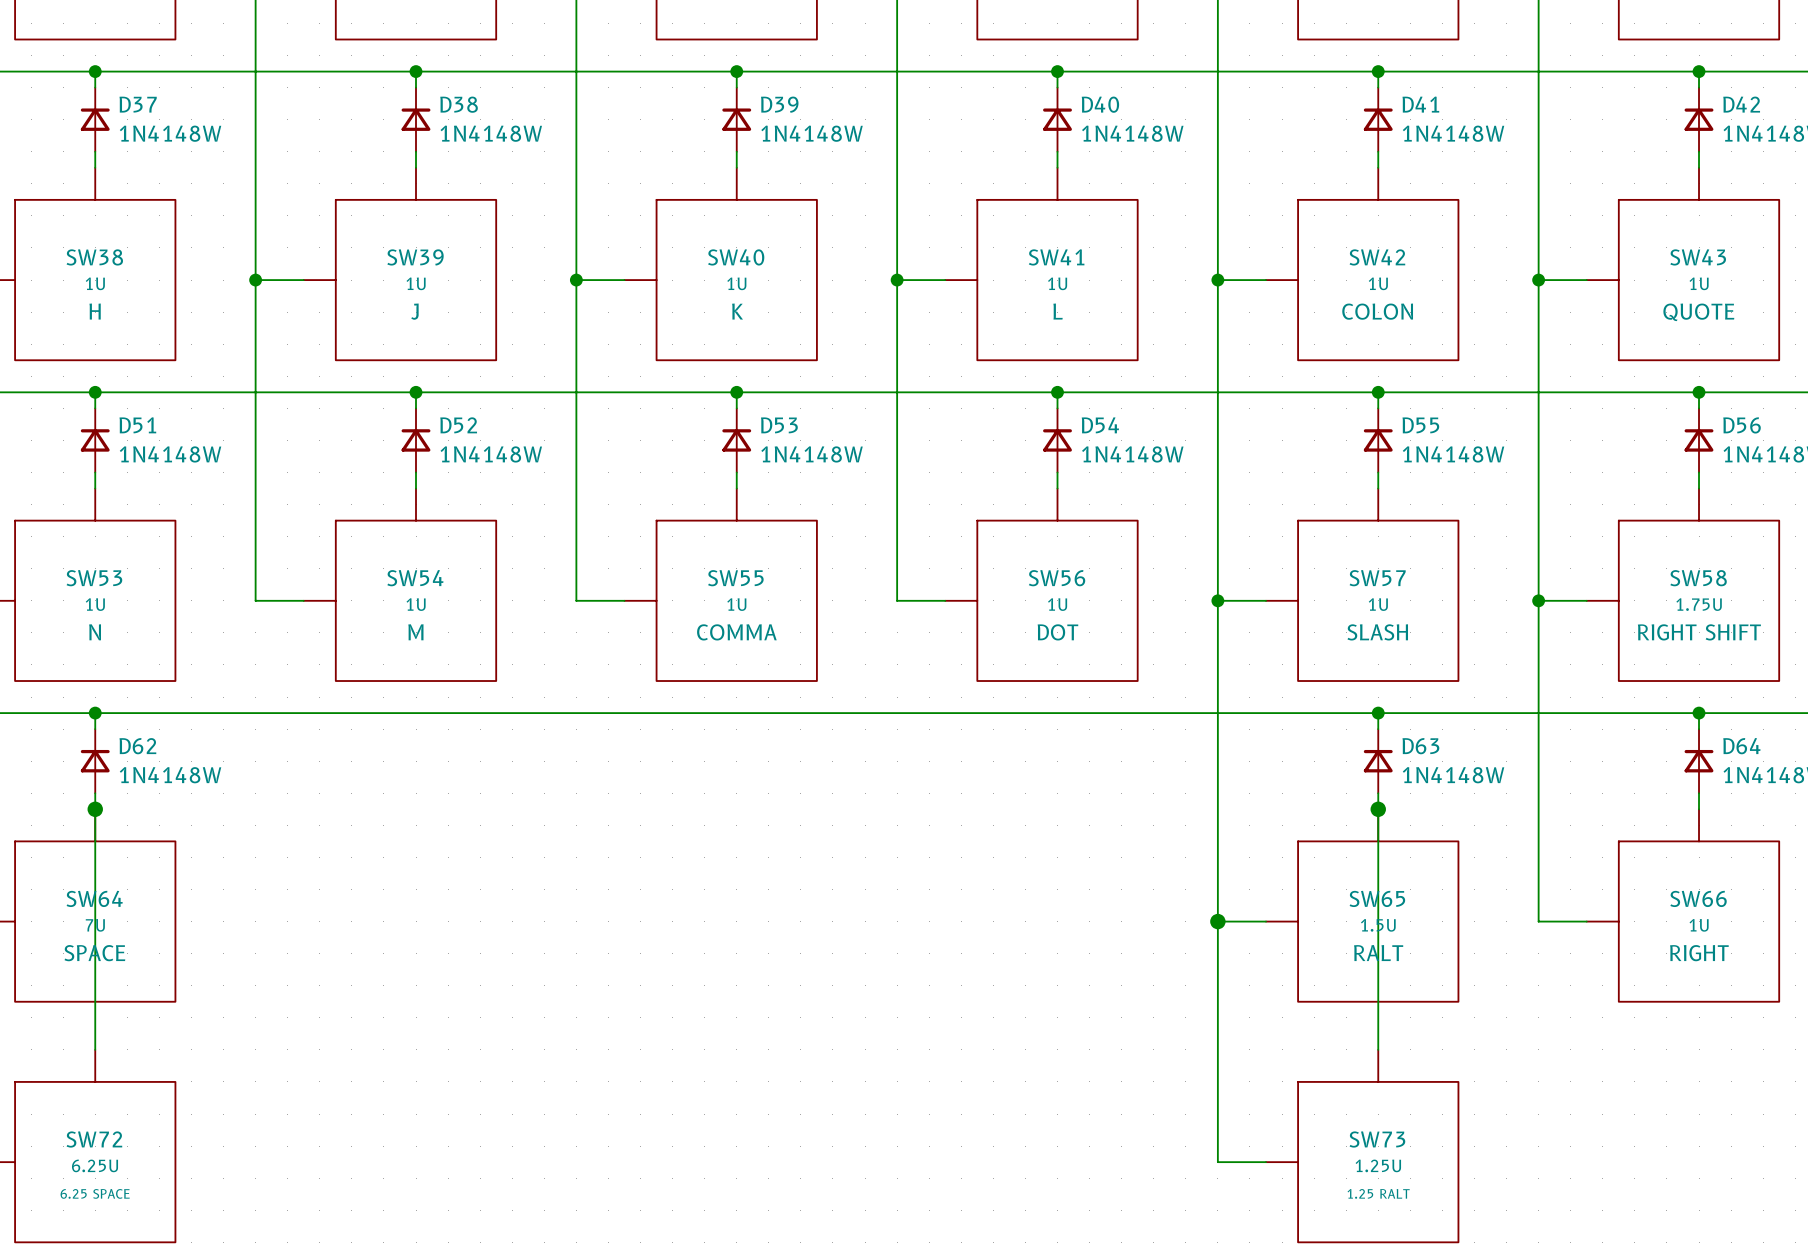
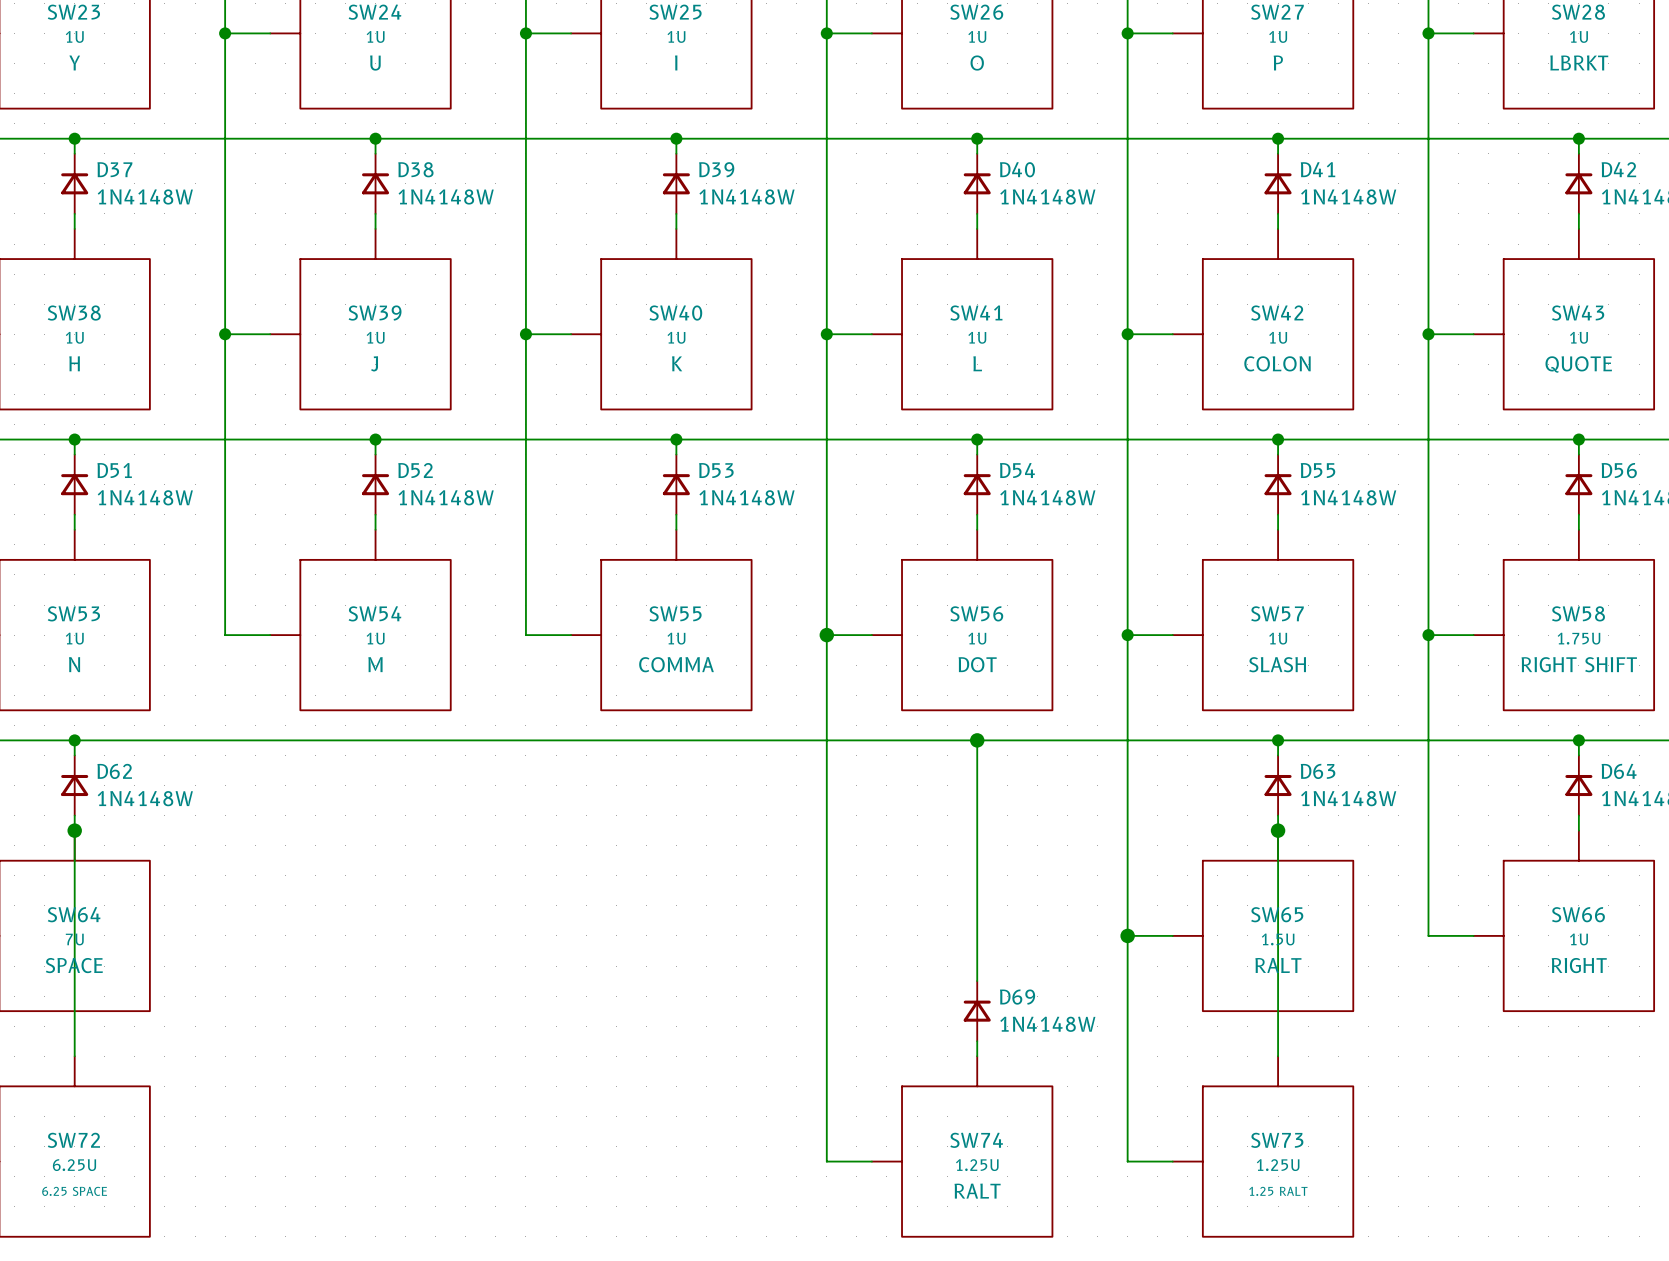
wire: none -> (826, 635) (826, 1161) (871, 1161)
junction: none -> (826, 635)
wire: none -> (977, 740) (977, 981)
junction: none -> (977, 740)
D69: none -> 1N4148W (977, 1011)
wire: none -> (977, 1041) (977, 1056)
SW74: none -> 1.25U (962, 1146)

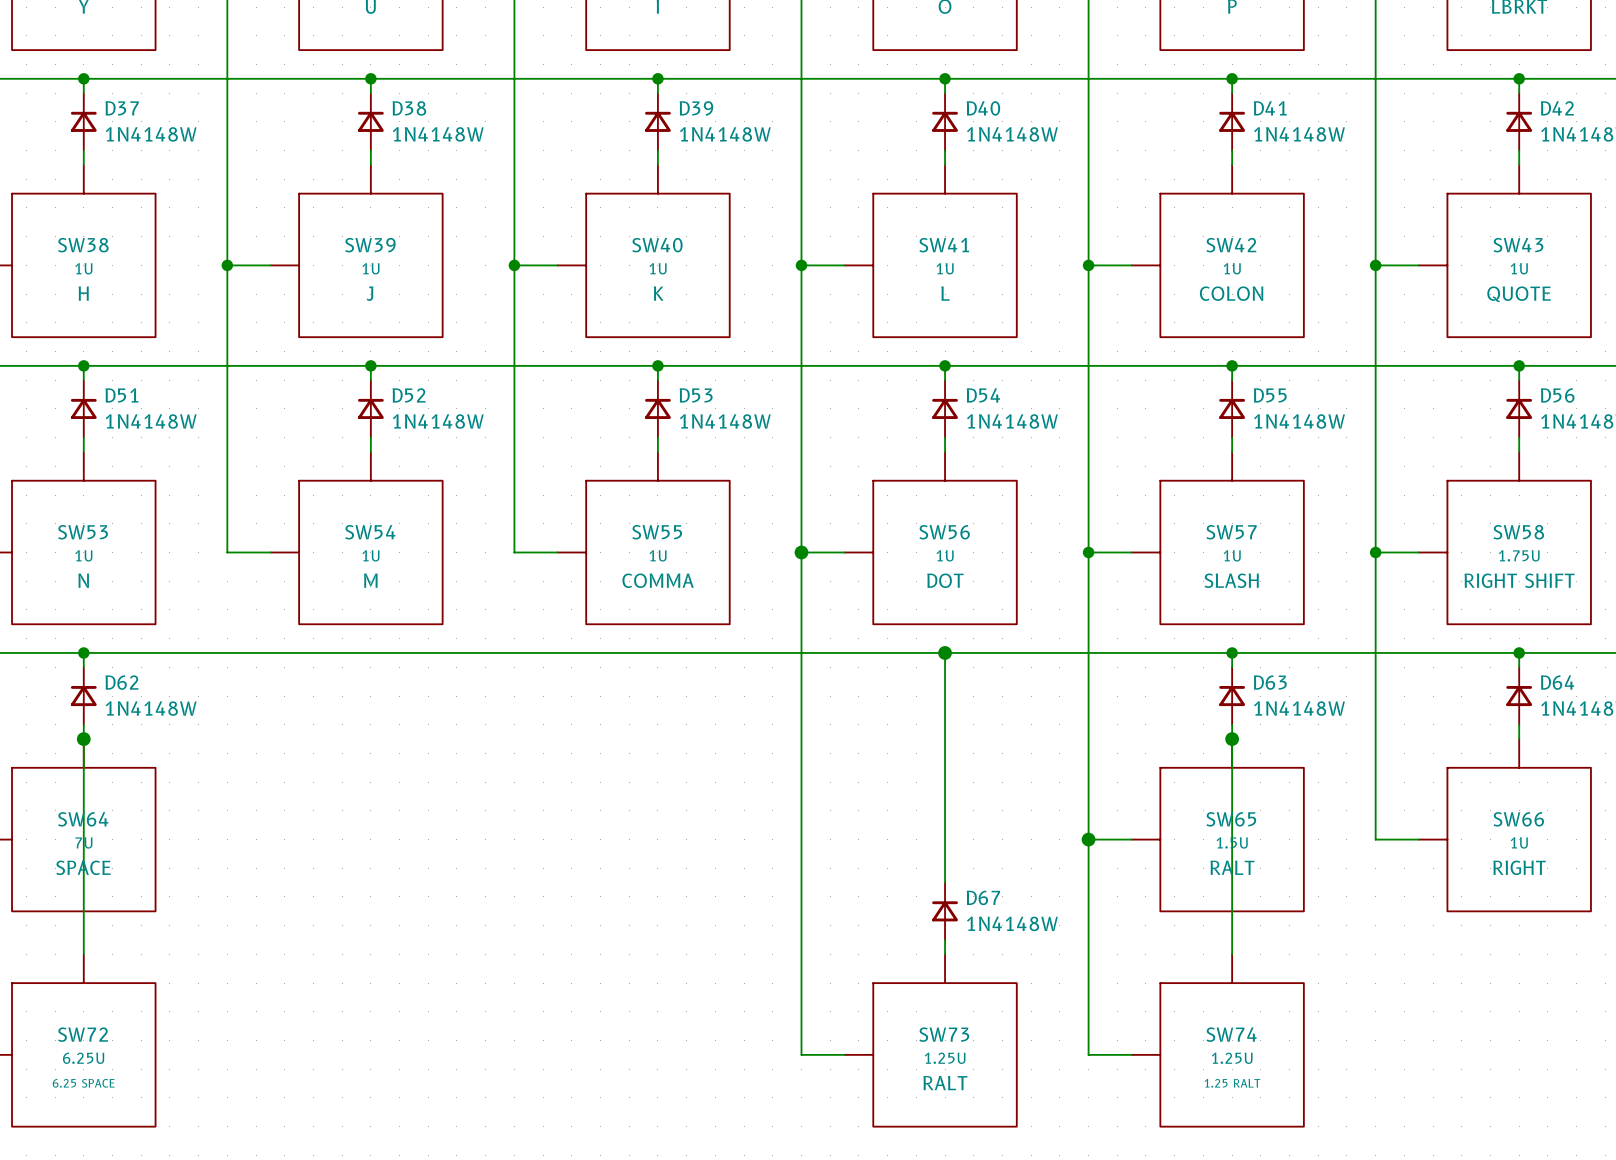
D69 name: D69 (1017, 997) -> D67 (983, 897)
SW74 name: SW74 (976, 1140) -> SW73 (944, 1034)
SW73 name: SW73 (1277, 1140) -> SW74 (1231, 1034)

